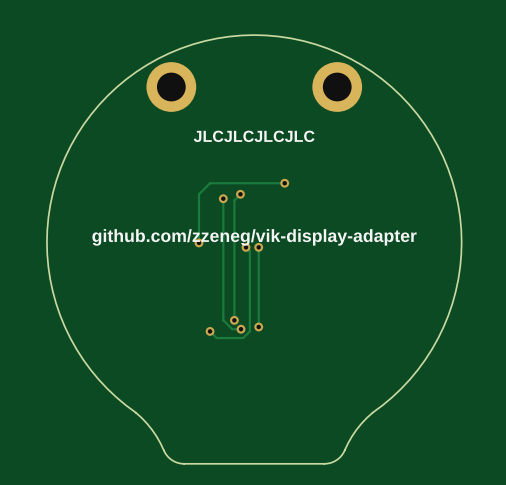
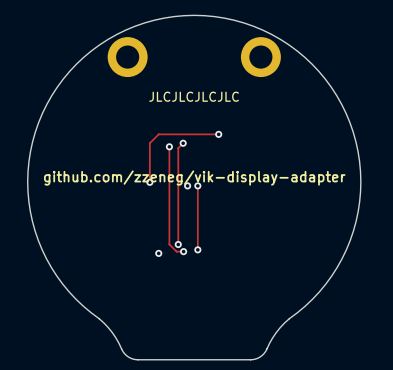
track: (245, 247) (249, 251) (249, 331) (243, 338) (216, 338) (210, 331) -> none

